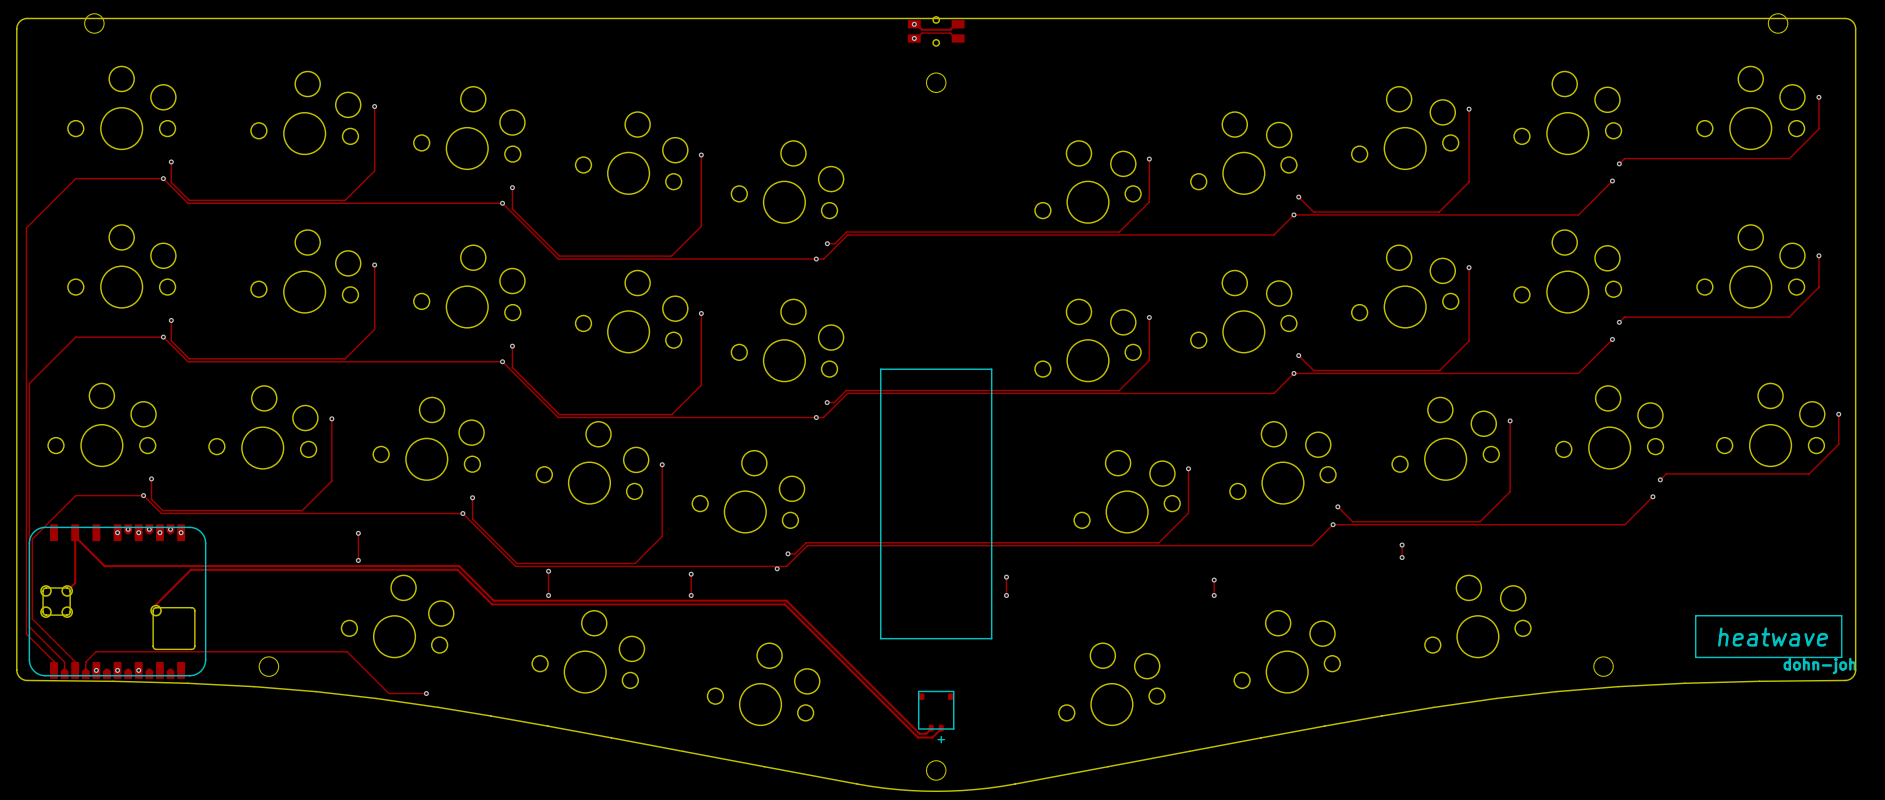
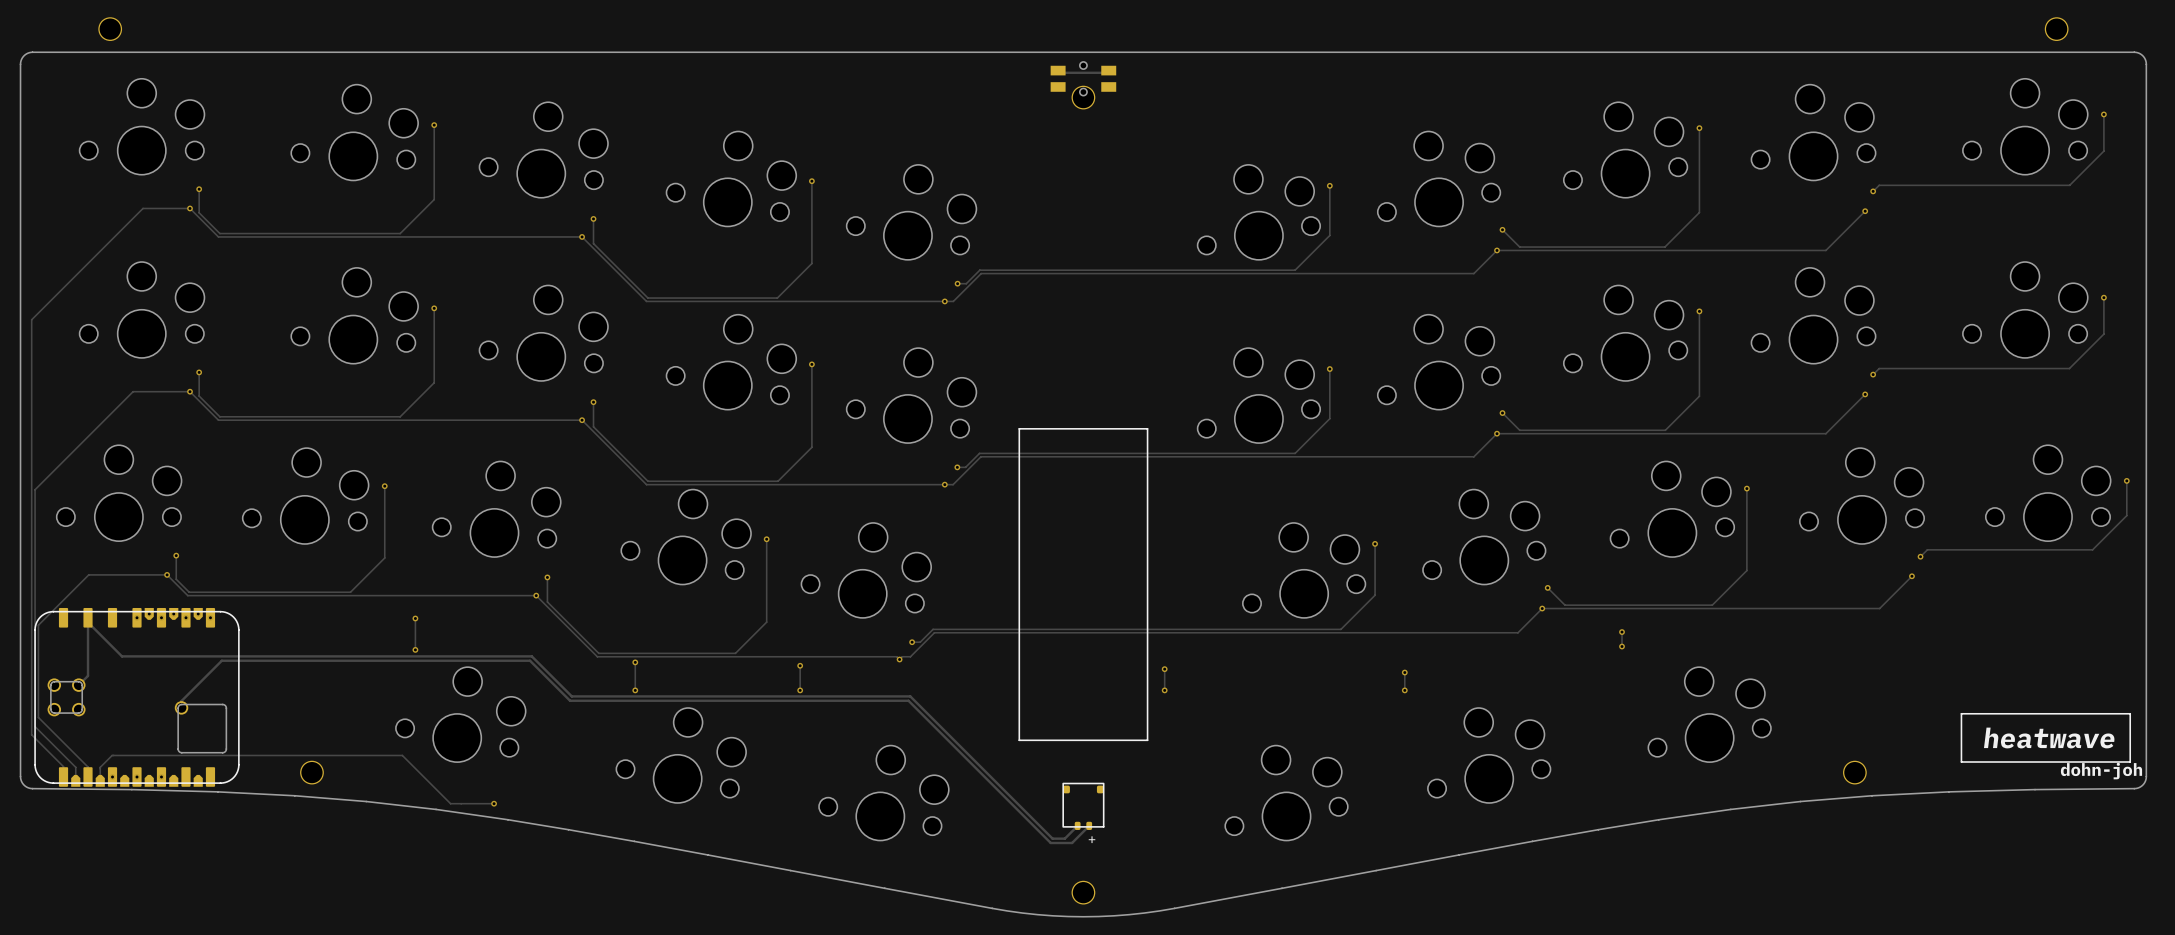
drawing: [16, 17, 1857, 792] -> none
track: (914, 24) (922, 29) (950, 29) (958, 24) -> none
via: (914, 24) -> none
part position: (936, 31) -> (1083, 78)
track: (914, 38) (922, 33) (950, 33) (958, 38) -> none
via: (914, 38) -> none
drawing: none -> [19, 51, 2148, 918]
track: none -> (1058, 70) (1060, 72) (1106, 72) (1108, 70)
track: (122, 178) (75, 178) (26, 228) (26, 274) -> (142, 208) (31, 319)
track: (114, 337) (75, 337) (29, 383) (29, 421) -> (133, 391) (35, 489)
part position: (936, 711) -> (1083, 806)
track: (909, 723) (919, 733) (926, 733) (931, 728) -> (1052, 838) (1064, 838) (1077, 825)
track: (907, 727) (917, 737) (932, 737) (941, 728) -> (1050, 843) (1072, 843) (1089, 825)

